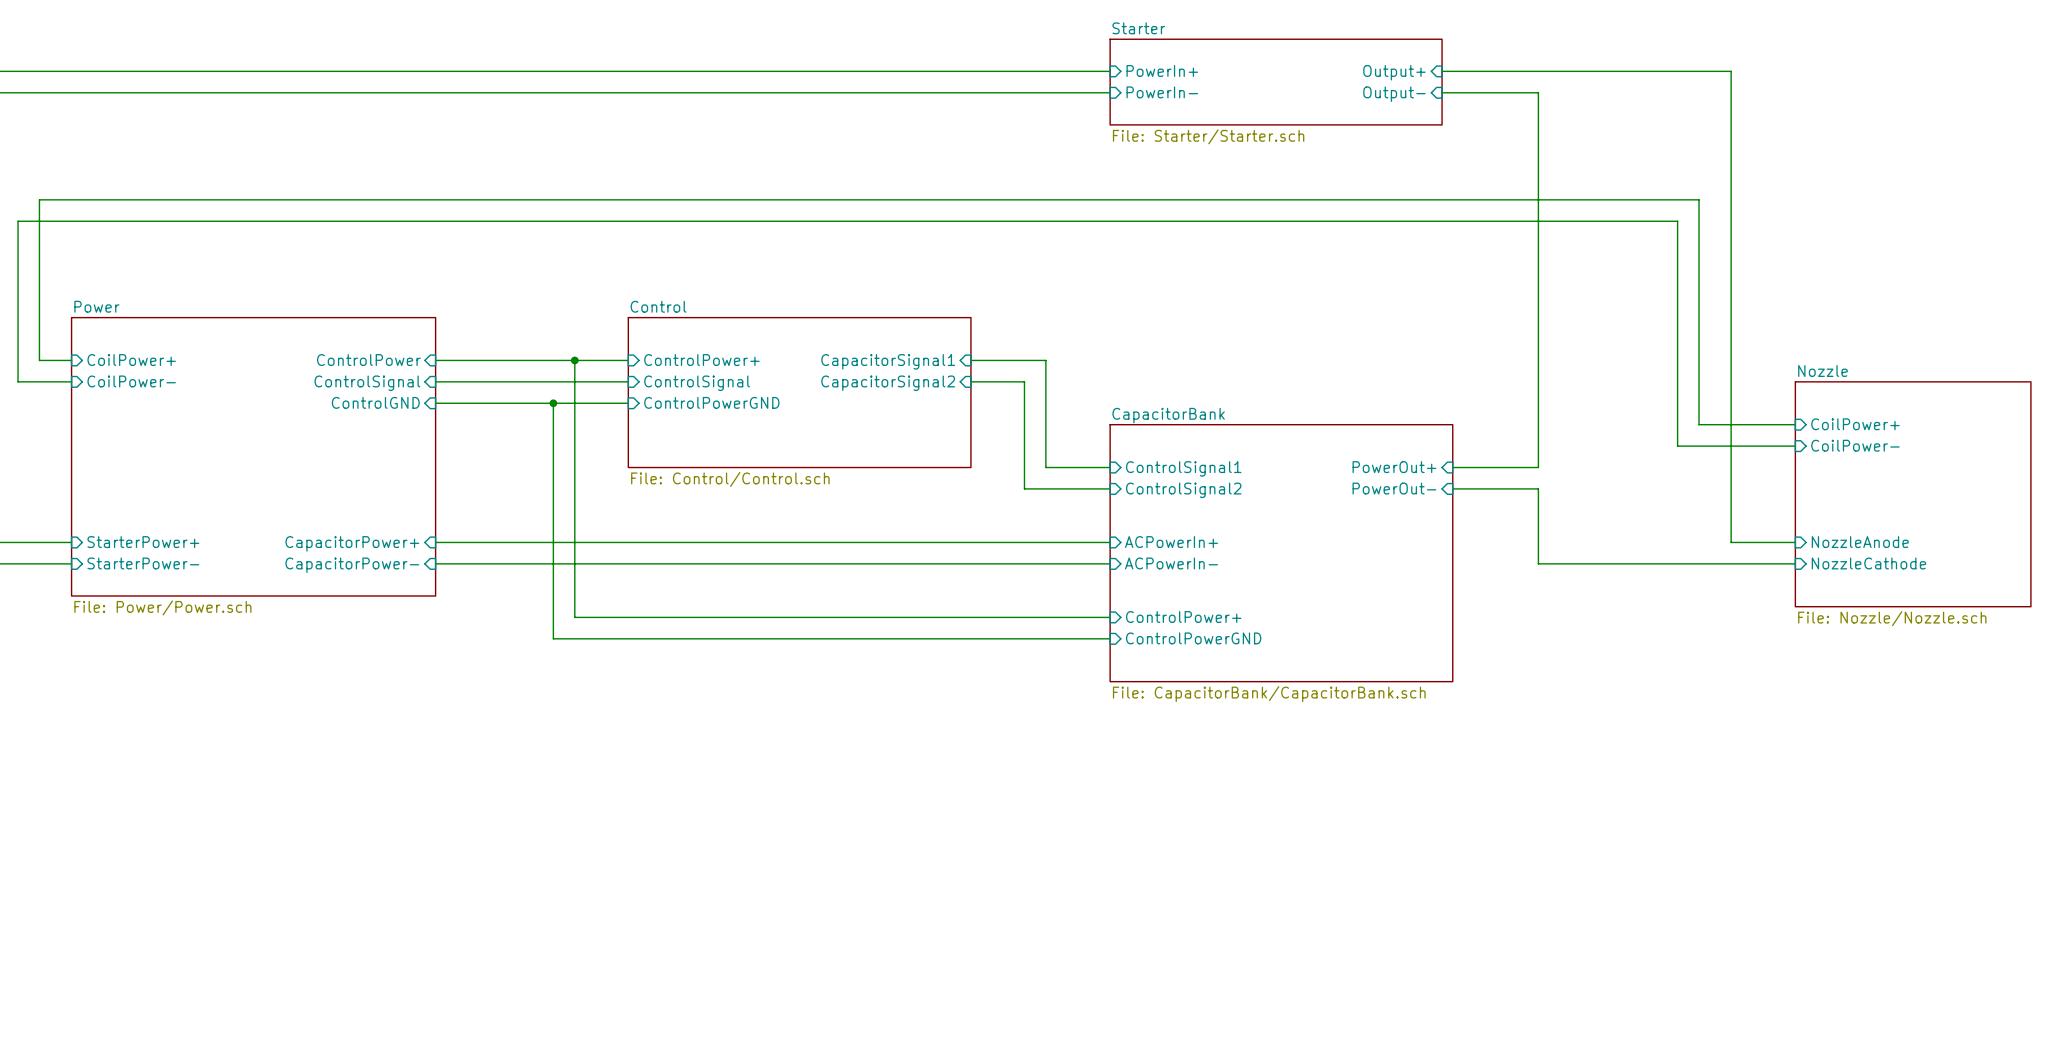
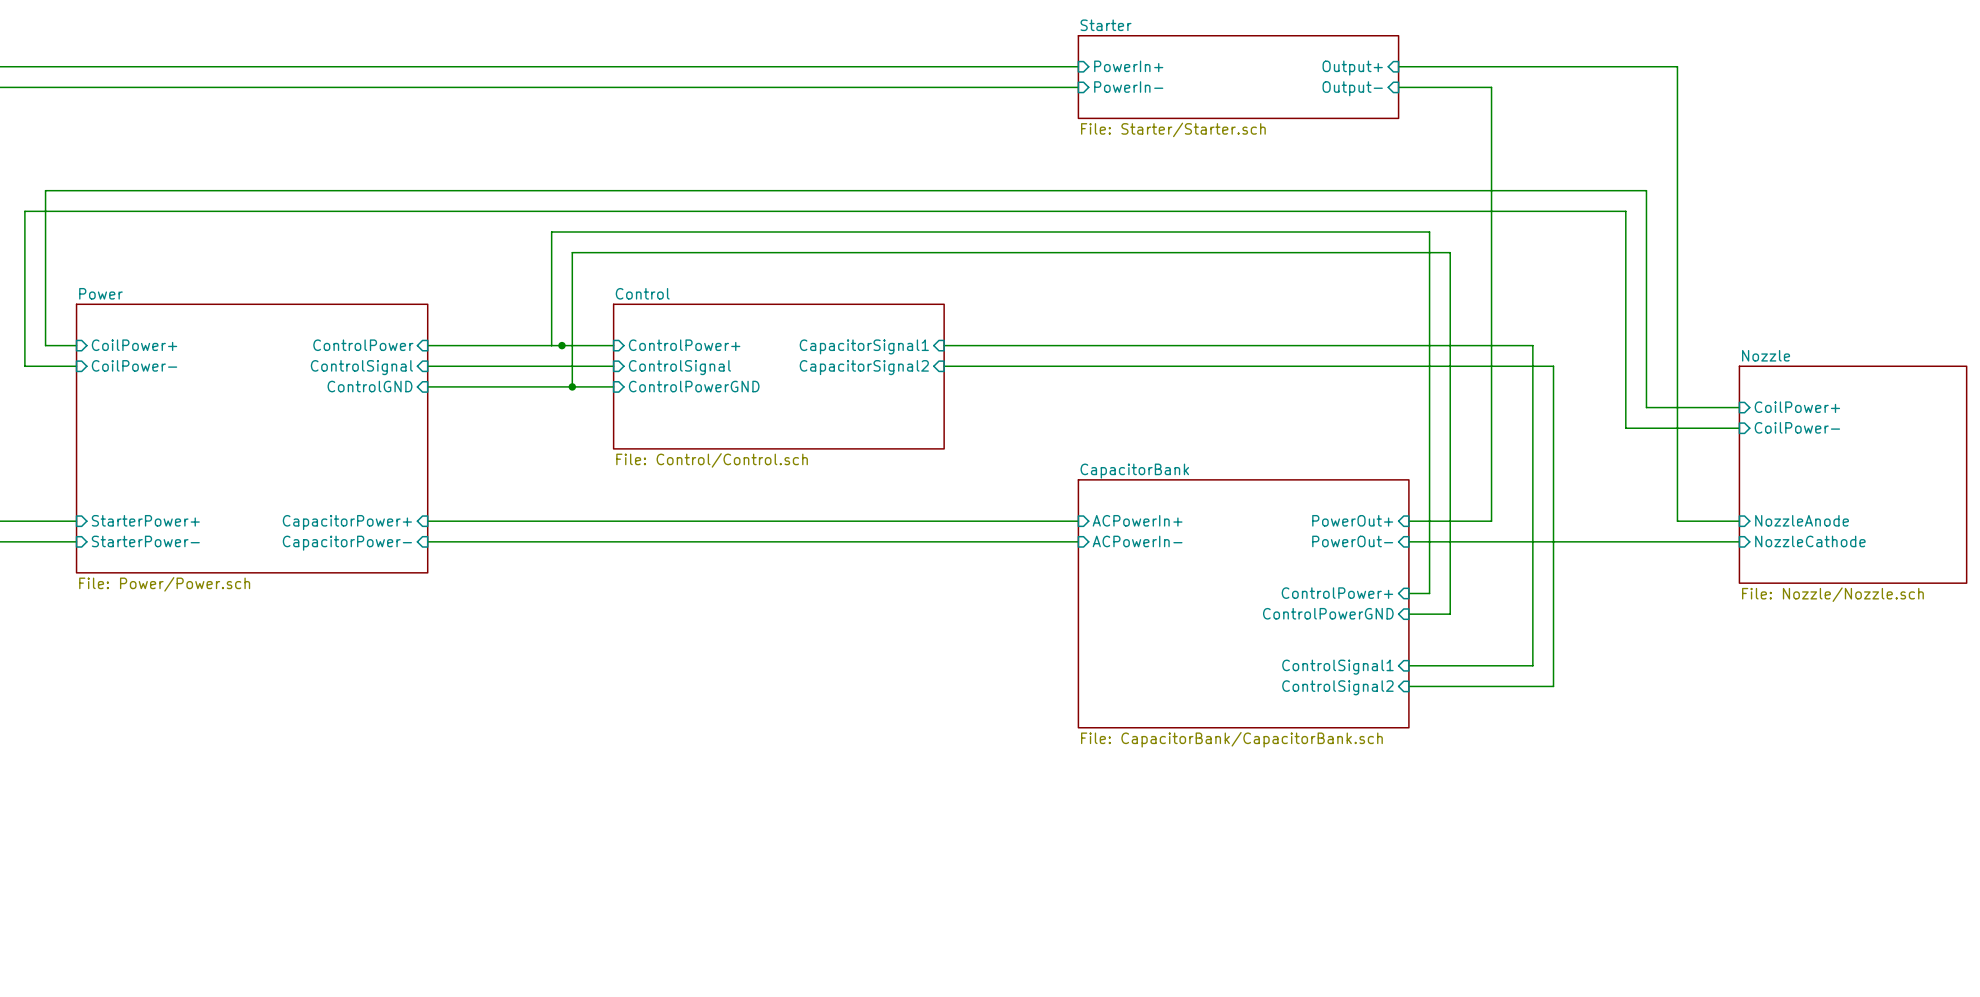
wire: none -> (551, 345) (551, 231) (1429, 231) (1429, 593) (1408, 593)
wire: (574, 360) (574, 617) (1110, 617) -> none
wire: (1045, 360) (1045, 467) (1110, 467) -> (1016, 345) (1532, 345) (1532, 665) (1408, 665)
wire: (1024, 381) (1024, 488) (1110, 488) -> (995, 366) (1553, 366) (1553, 686) (1408, 686)
wire: (553, 403) (553, 638) (1110, 638) -> none
junction position: (553, 403) -> (572, 386)
wire: none -> (572, 386) (572, 252) (1450, 252) (1450, 614) (1408, 614)
sheet pin position: PowerOut+ (1394, 467) -> PowerOut+ (1352, 520)
wire: (1452, 467) (1538, 467) -> (1491, 469) (1491, 448)
sheet pin: ControlSignal1 (1183, 468) -> none
sheet pin position: PowerOut- (1394, 488) -> PowerOut- (1352, 541)
wire: (1452, 488) (1538, 488) -> (1408, 541) (1491, 541)
sheet pin: ControlSignal2 (1183, 490) -> none
wire: (1538, 542) (1538, 563) -> (1491, 521) (1408, 521)
sheet CapacitorBank position: (1281, 553) -> (1243, 603)
sheet pin: ControlPower+ (1183, 617) -> none
sheet pin: none -> ControlPower+ (1337, 593)
sheet pin: ControlPowerGND (1193, 638) -> none
sheet pin: none -> ControlPowerGND (1328, 613)
sheet pin: none -> ControlSignal1 (1337, 667)
sheet pin: none -> ControlSignal2 (1337, 687)

